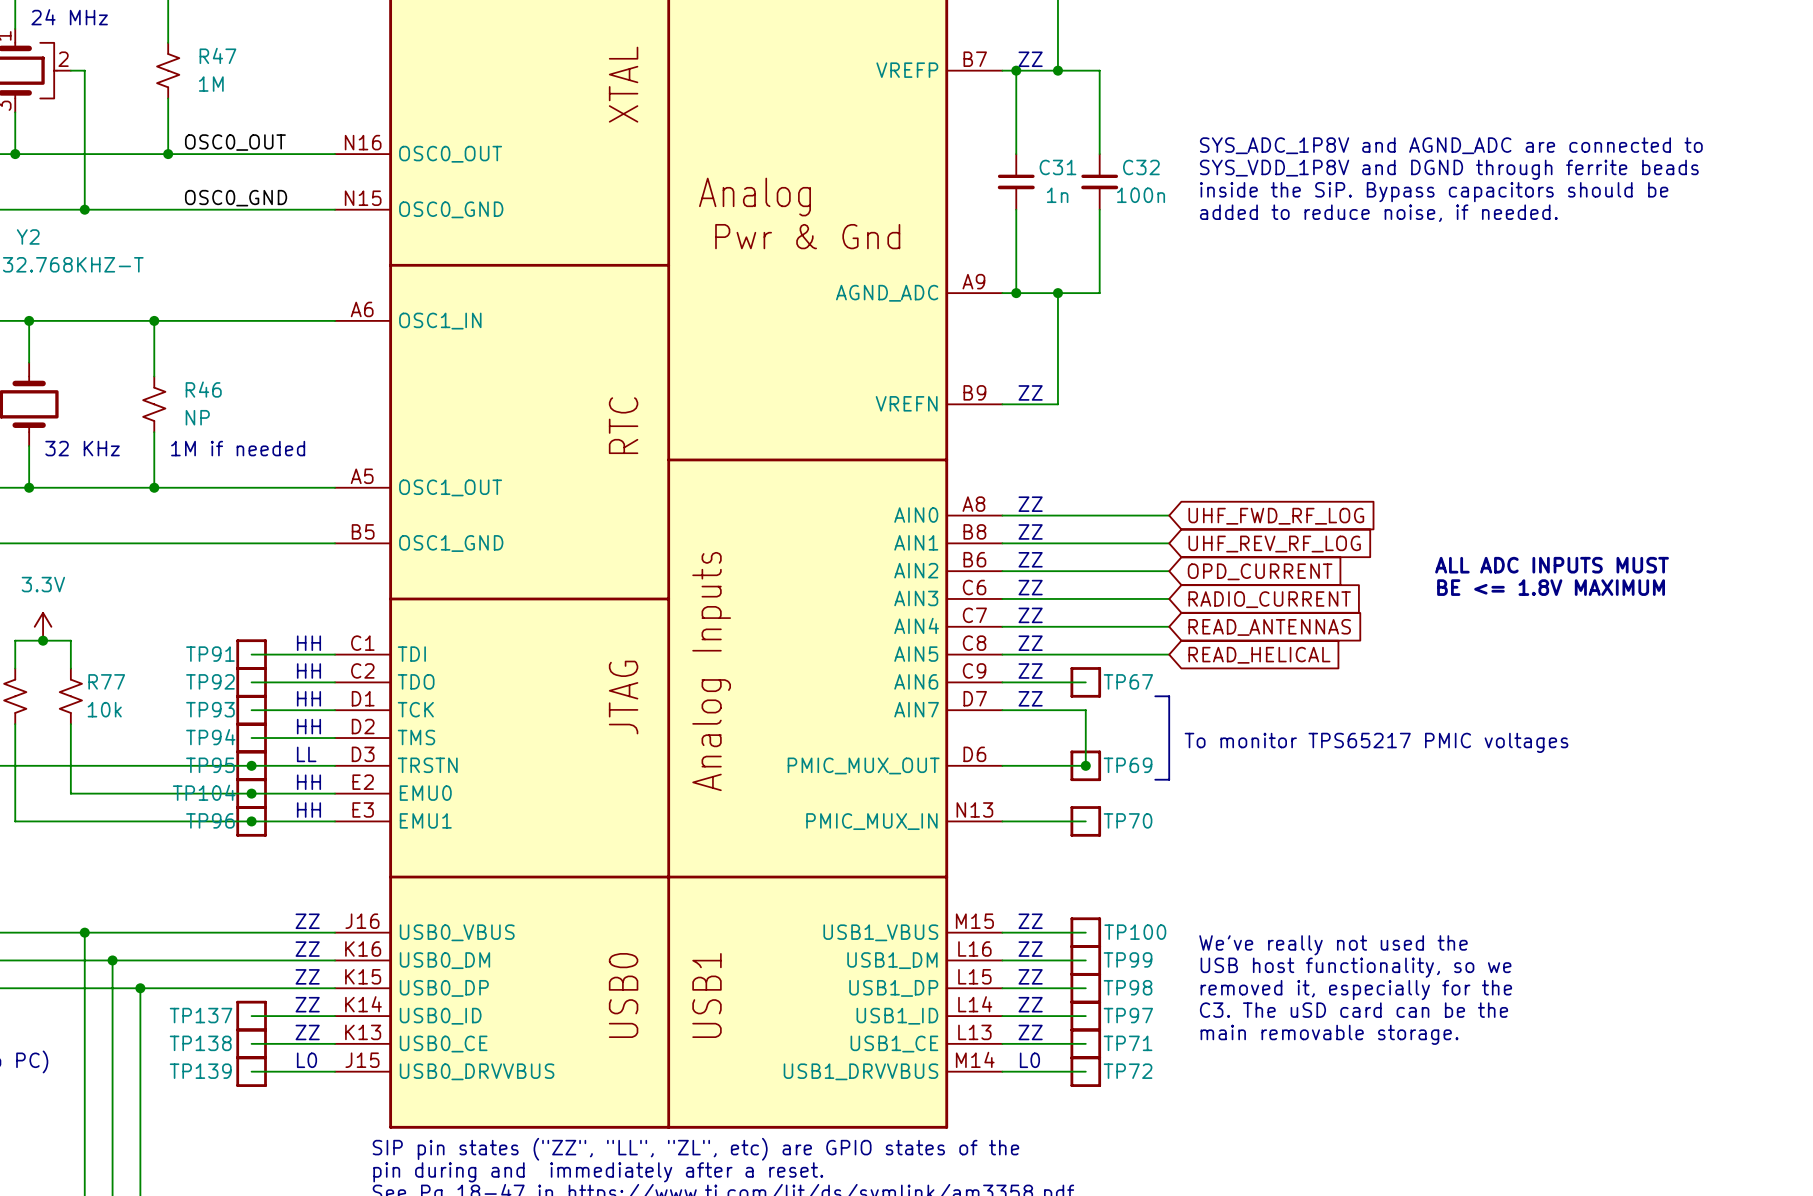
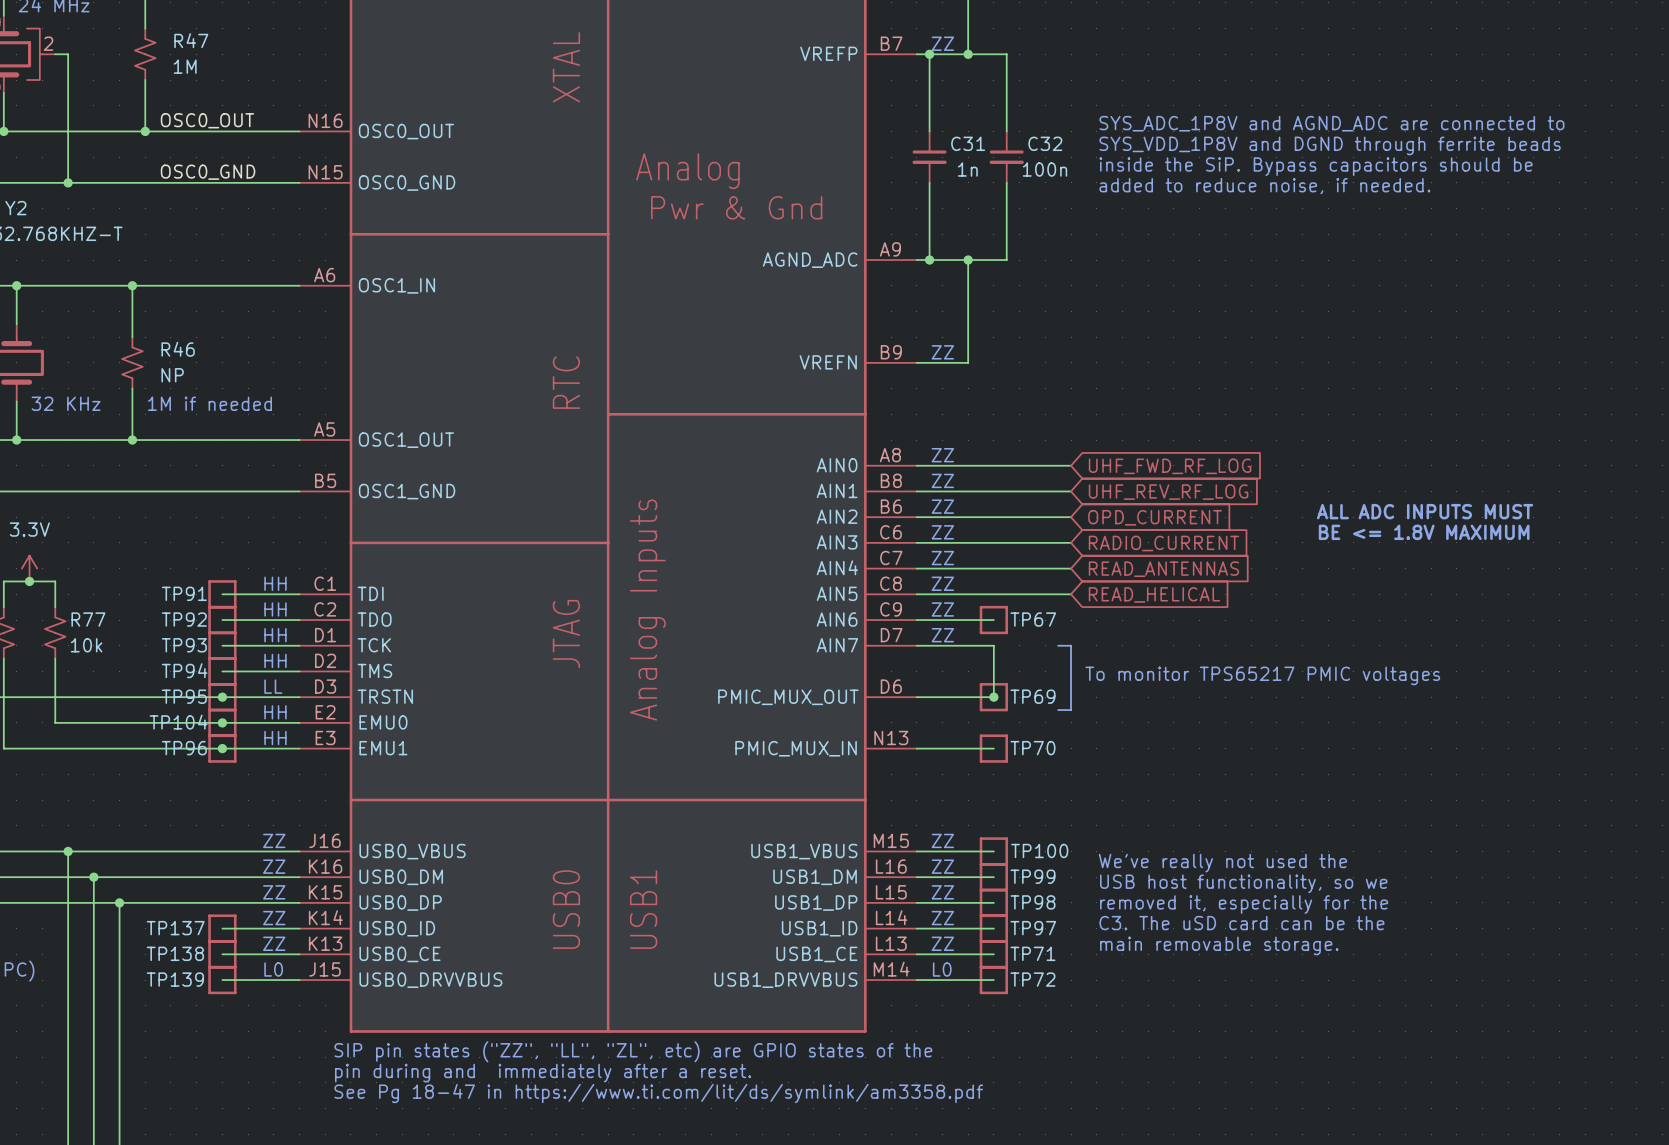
line: (1155, 696) (1169, 696) (1169, 710) -> (1058, 645) (1071, 645)

